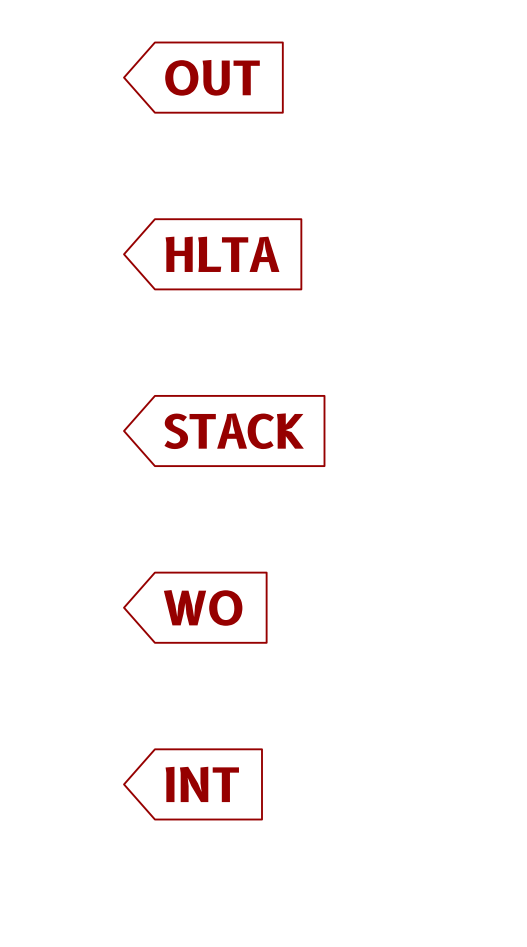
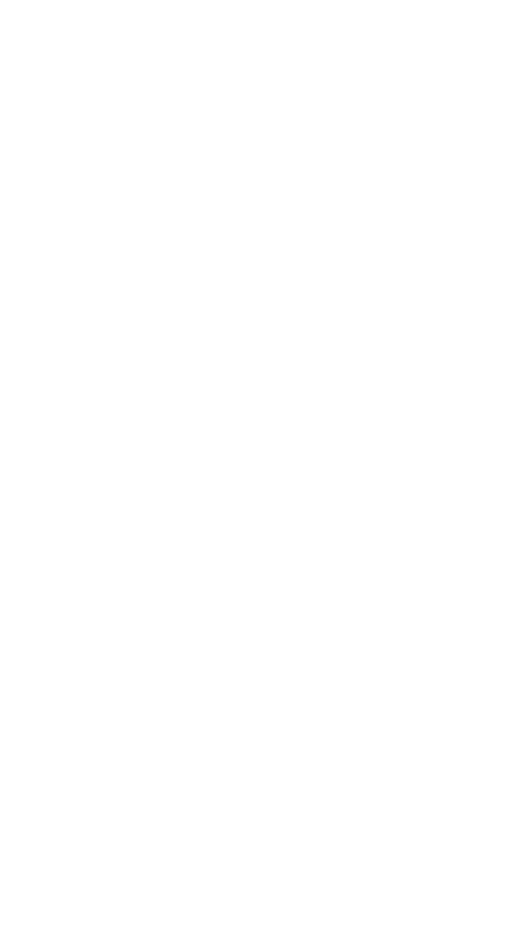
global label: OUT (212, 77) -> none
global label: HLTA (222, 254) -> none
global label: STACK (234, 431) -> none
global label: WO (203, 607) -> none
global label: INT (202, 784) -> none

